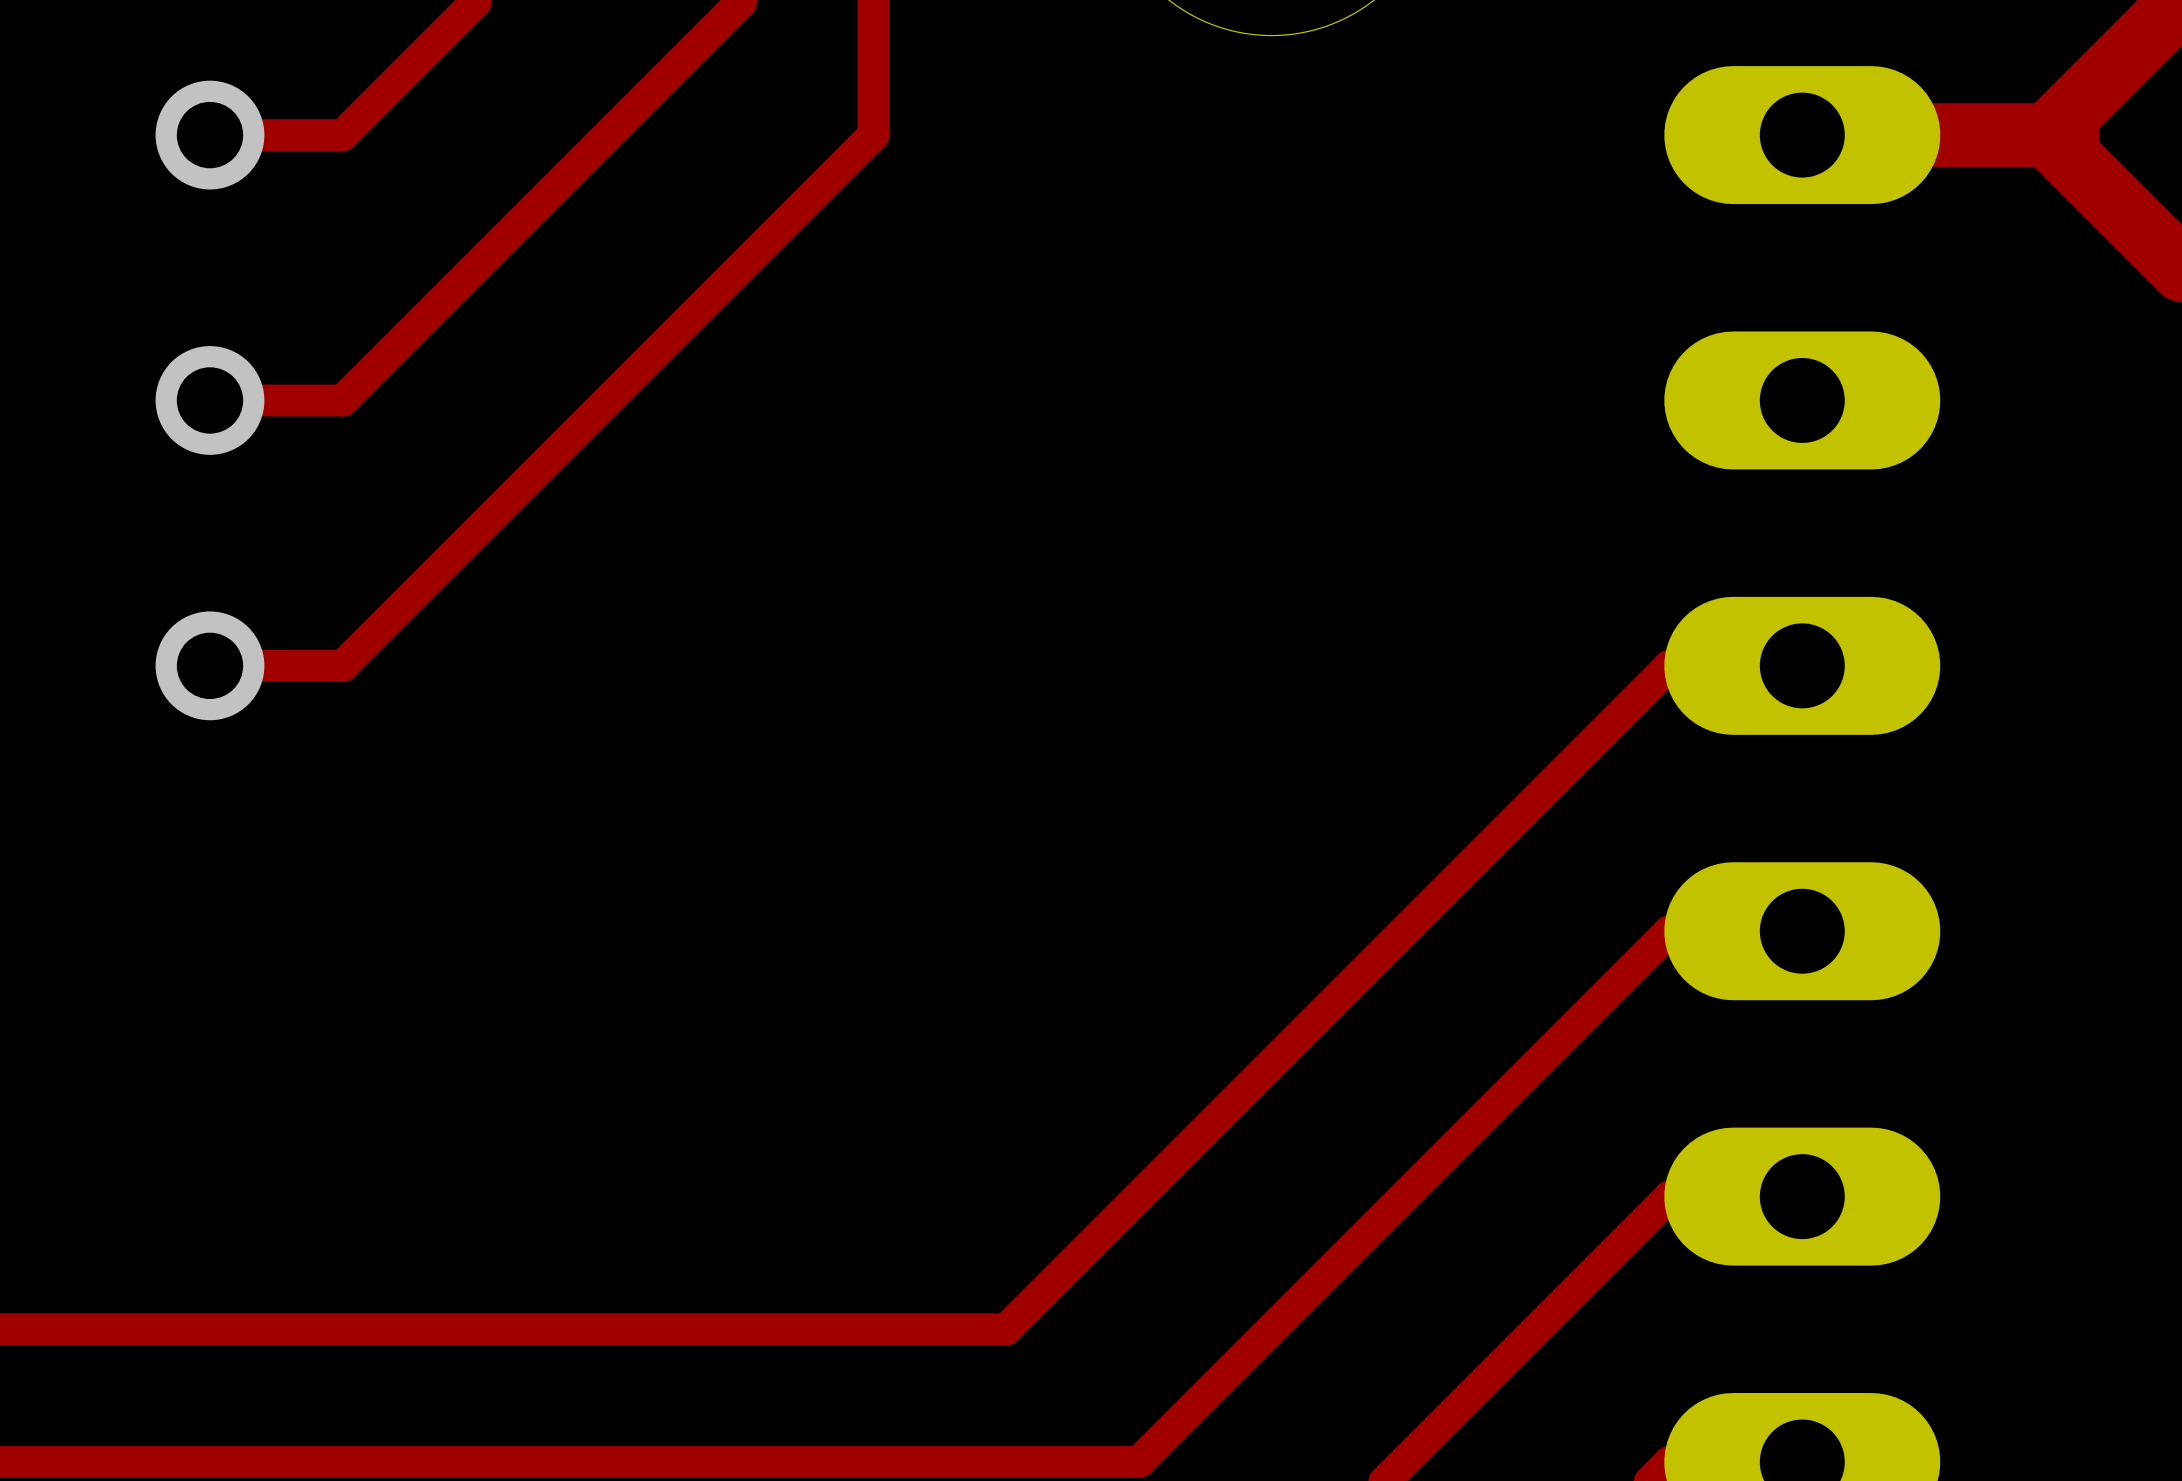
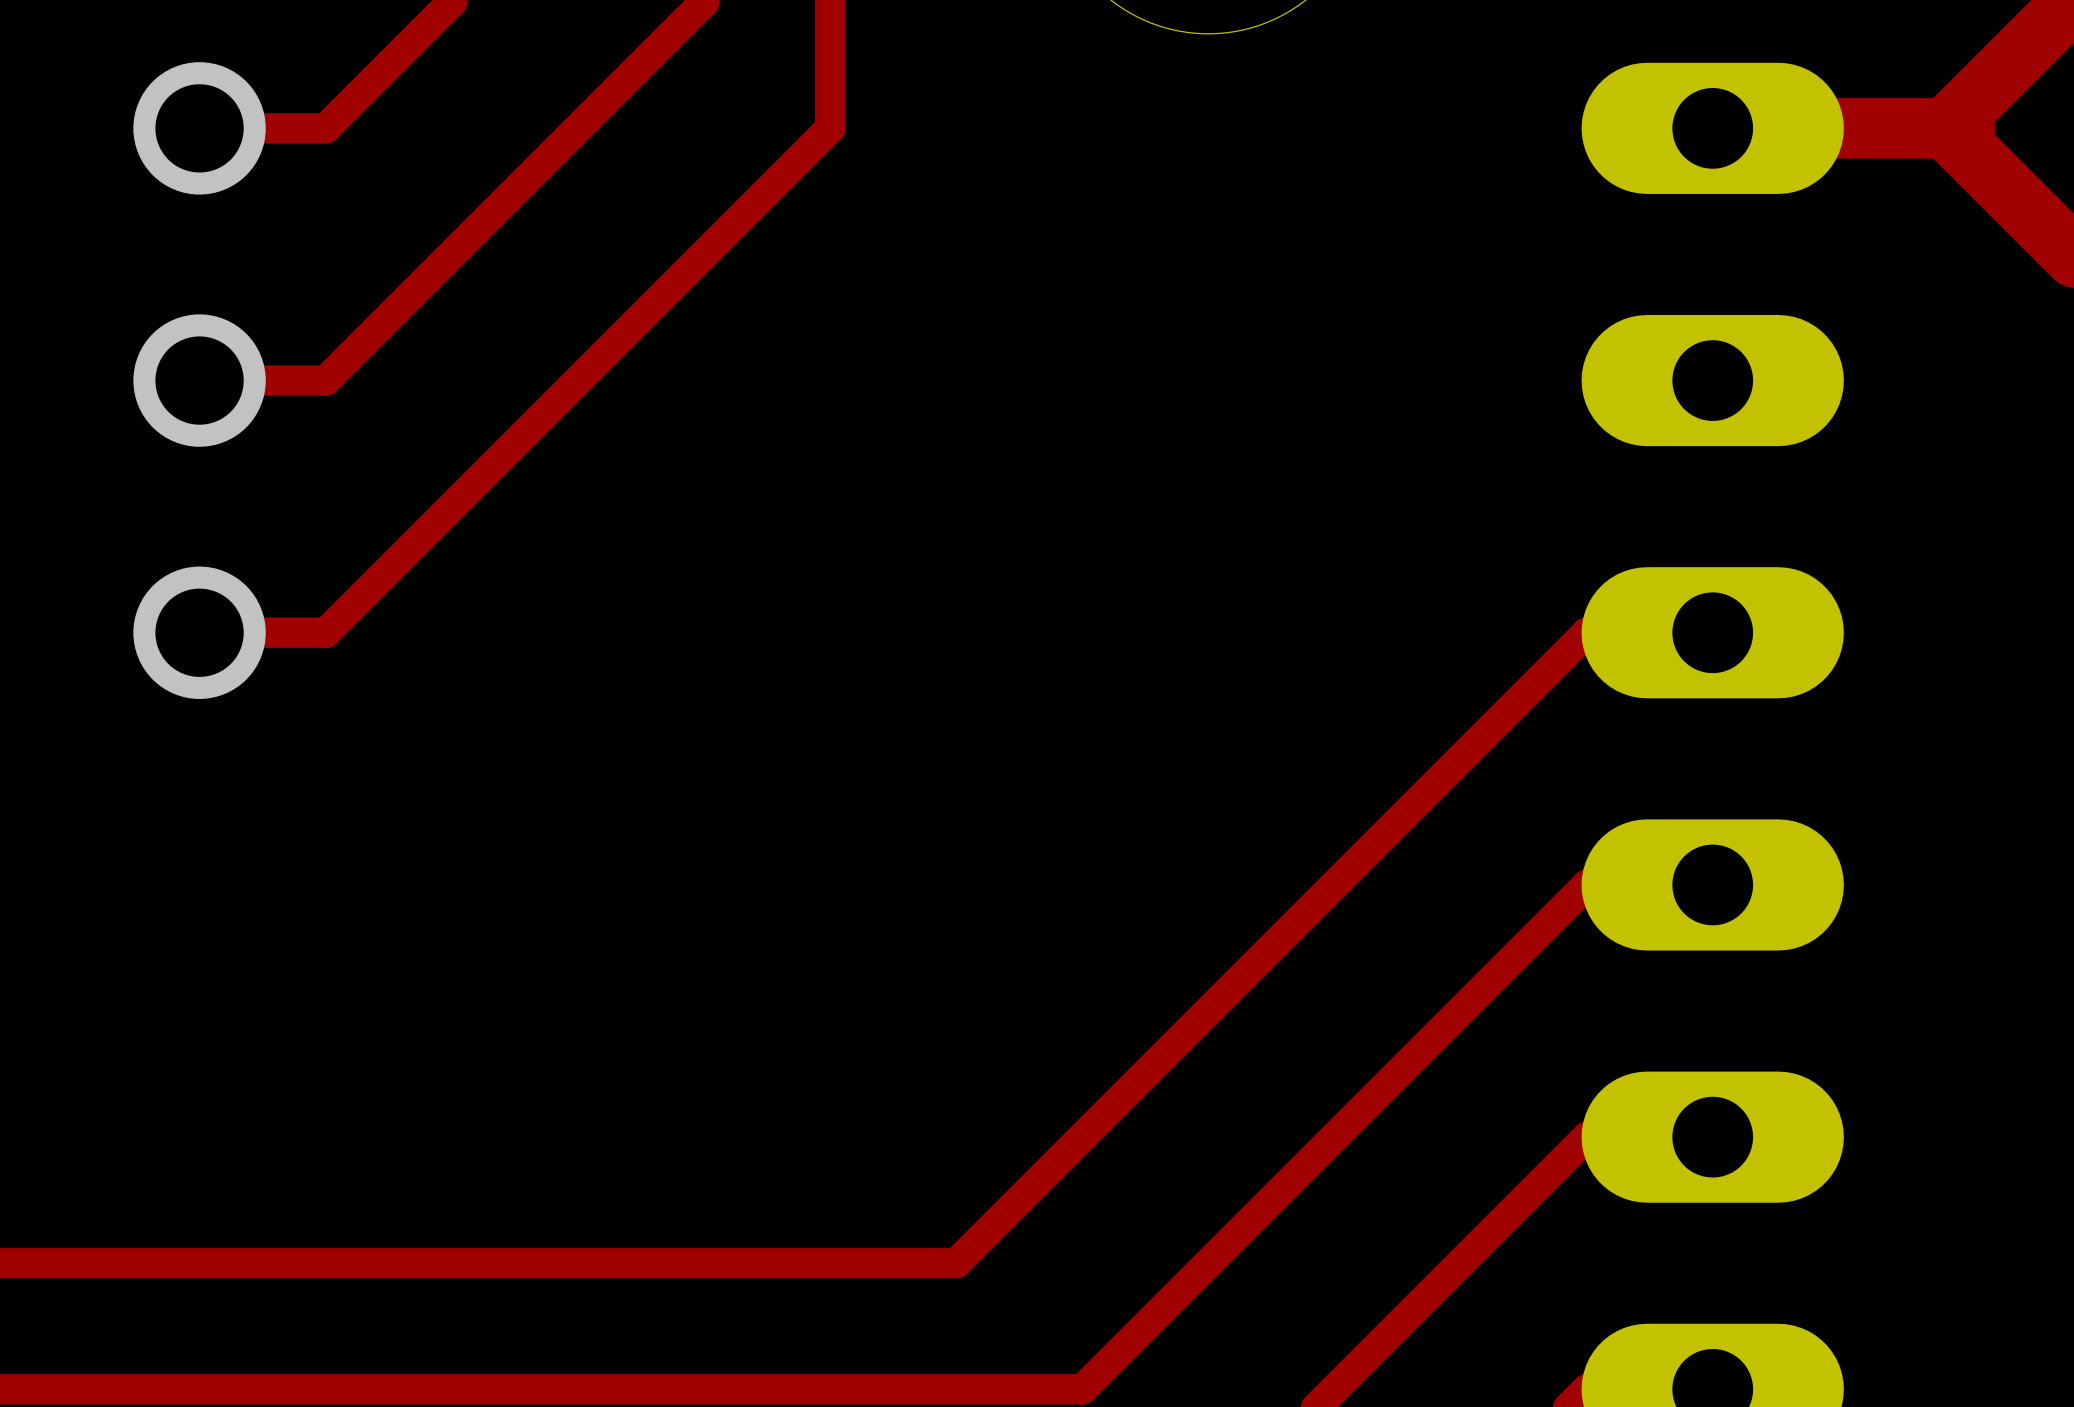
via size: [155, 80, 265, 190] -> [133, 62, 266, 195]
via size: [155, 346, 265, 455] -> [133, 314, 266, 447]
via size: [155, 611, 265, 721] -> [133, 566, 266, 699]

